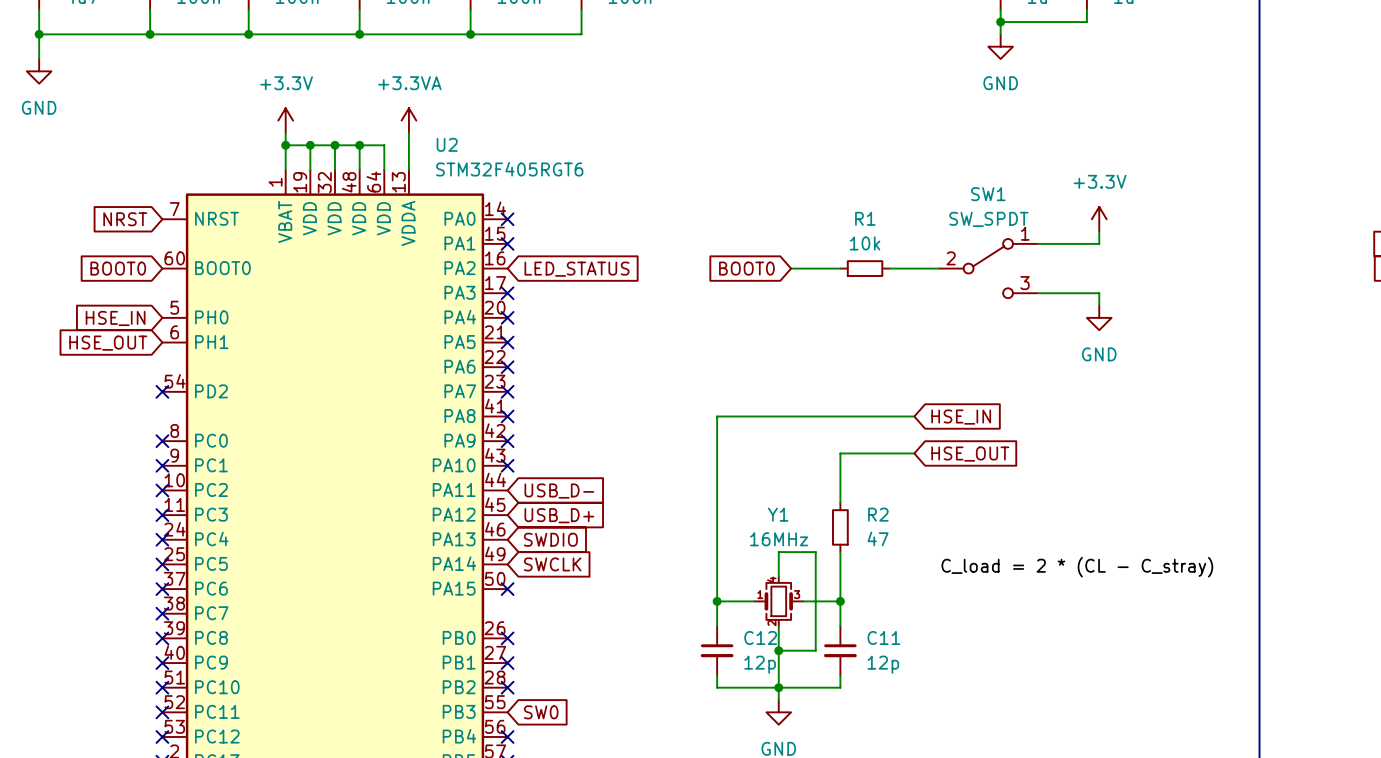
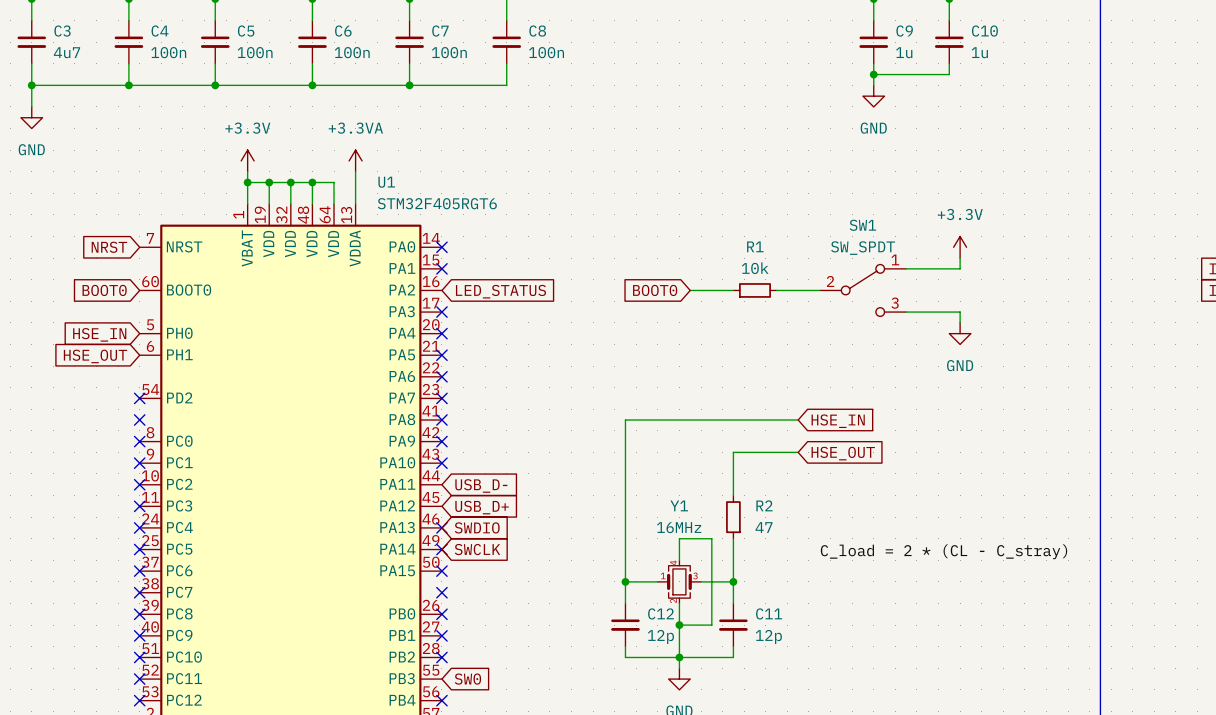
U2 name: U2 (447, 144) -> U1 (386, 182)
no-connect mark: none -> (139, 419)
no-connect mark: none -> (441, 527)
no-connect mark: none -> (441, 549)
no-connect mark: none -> (441, 592)

